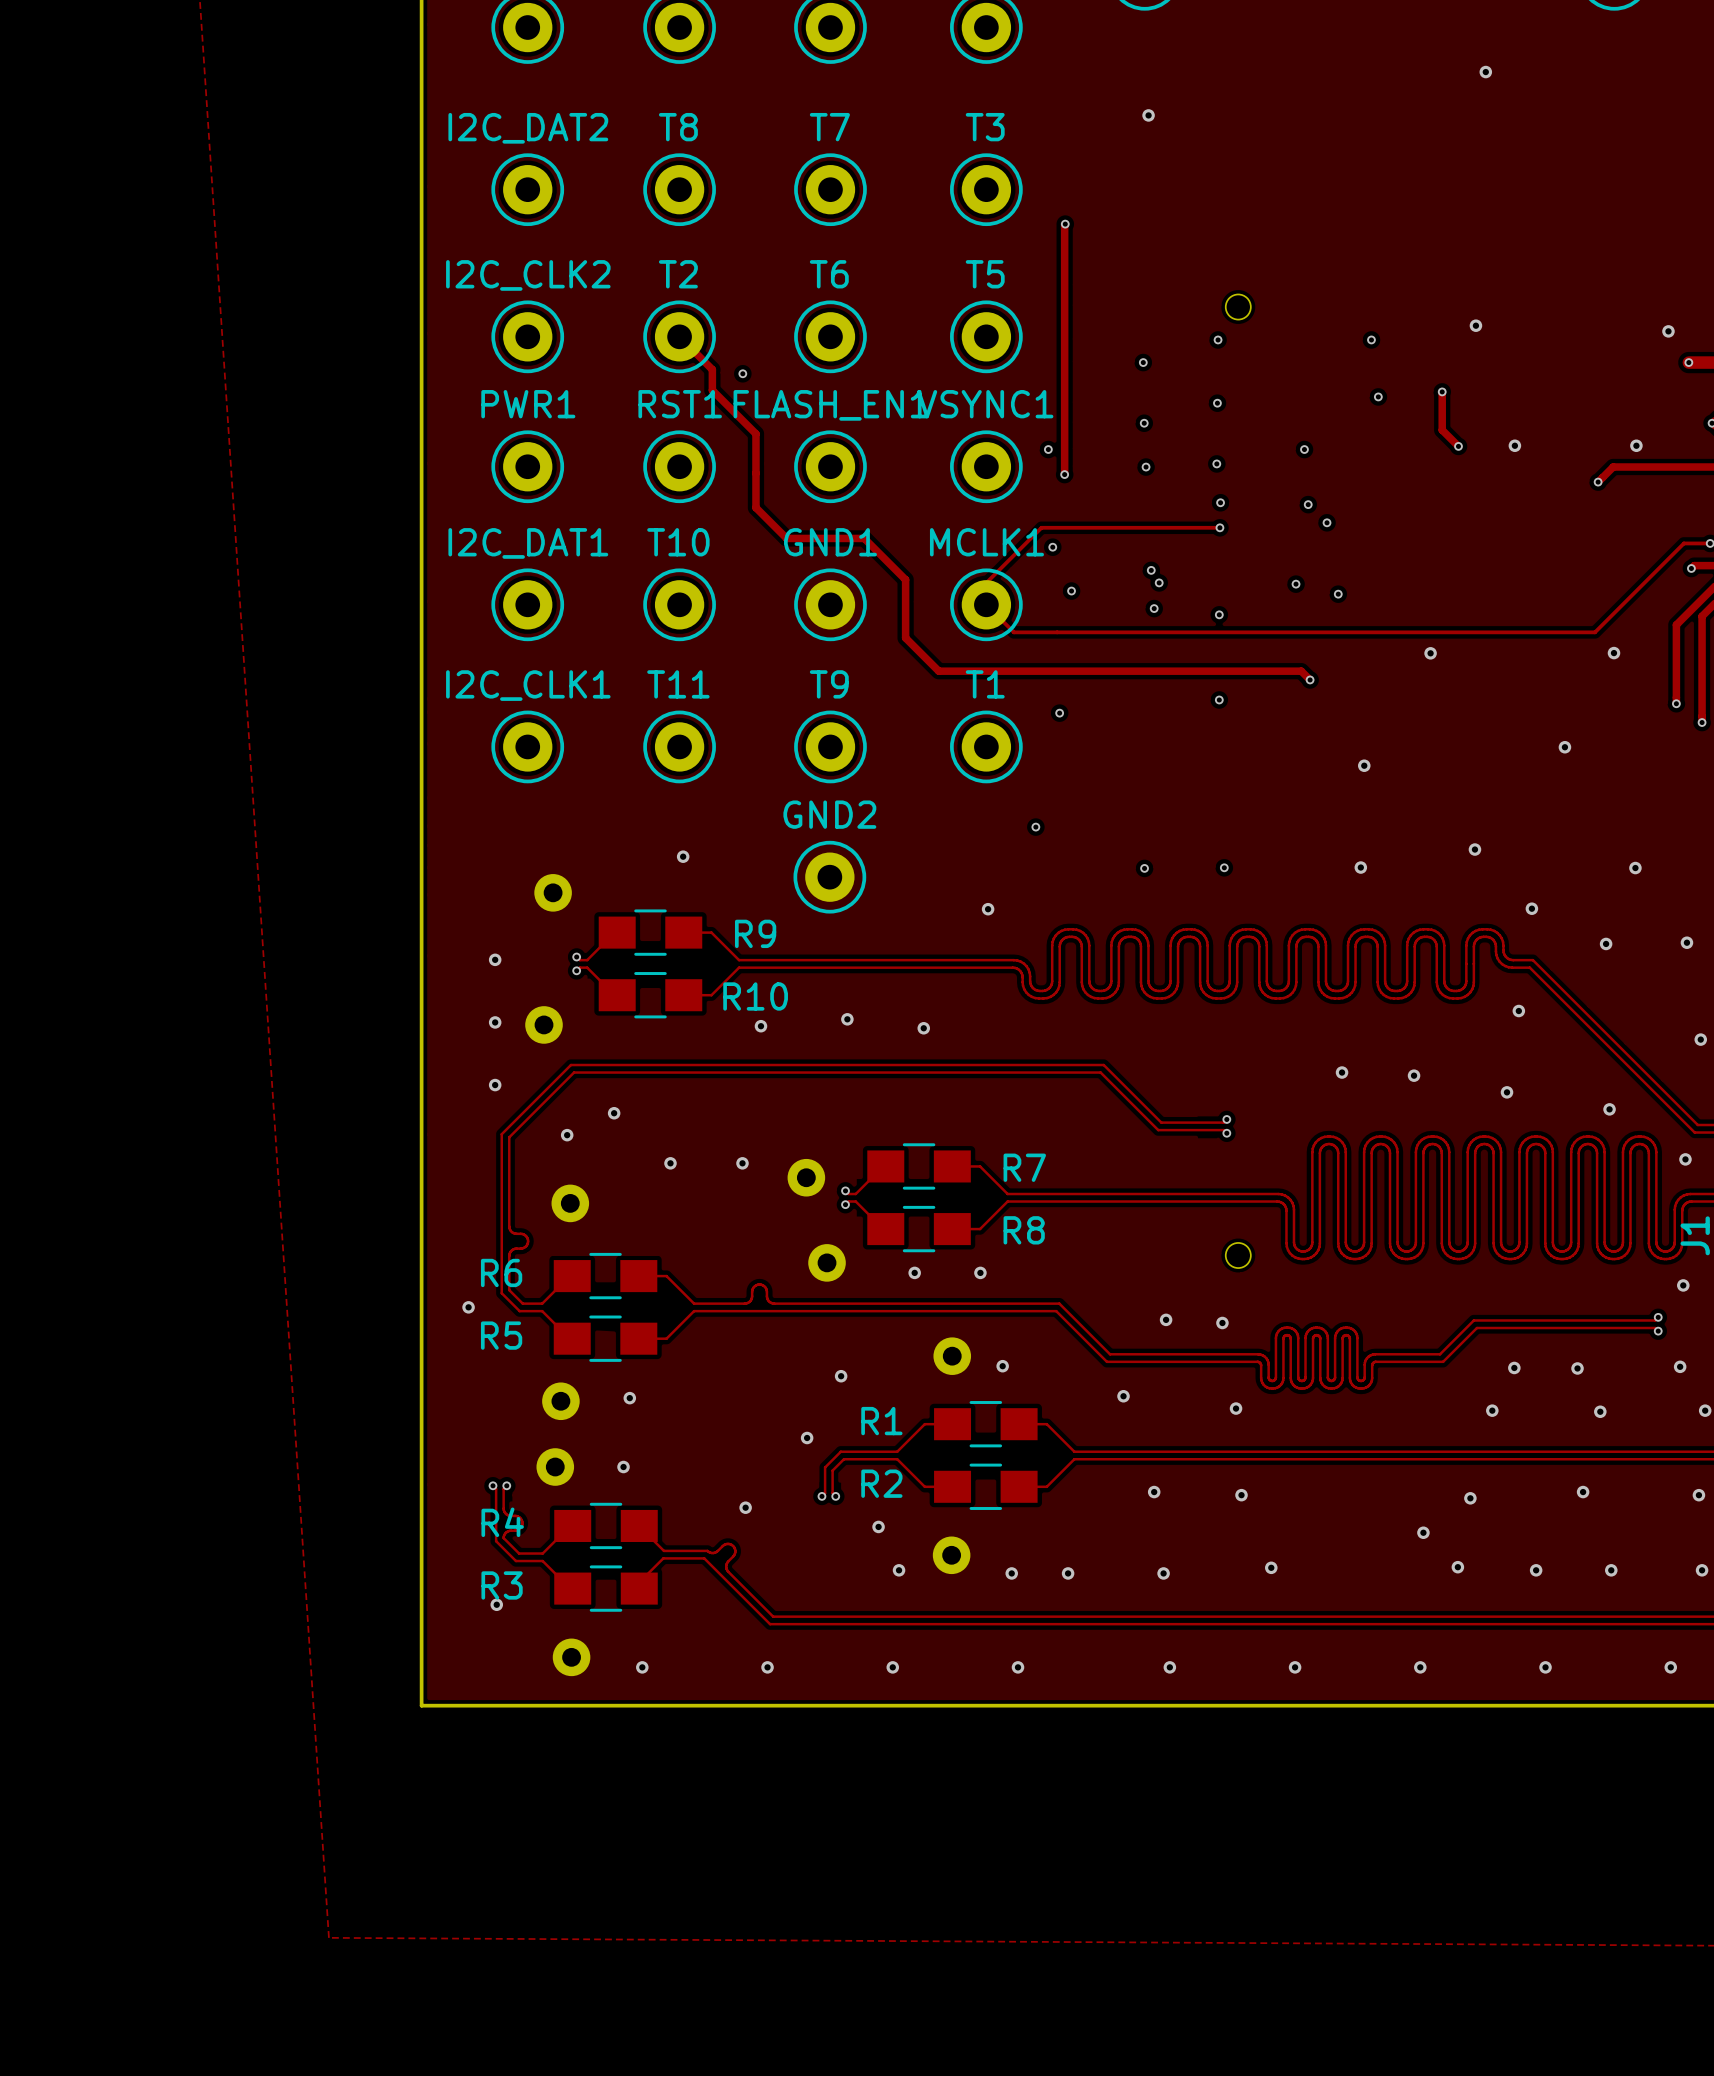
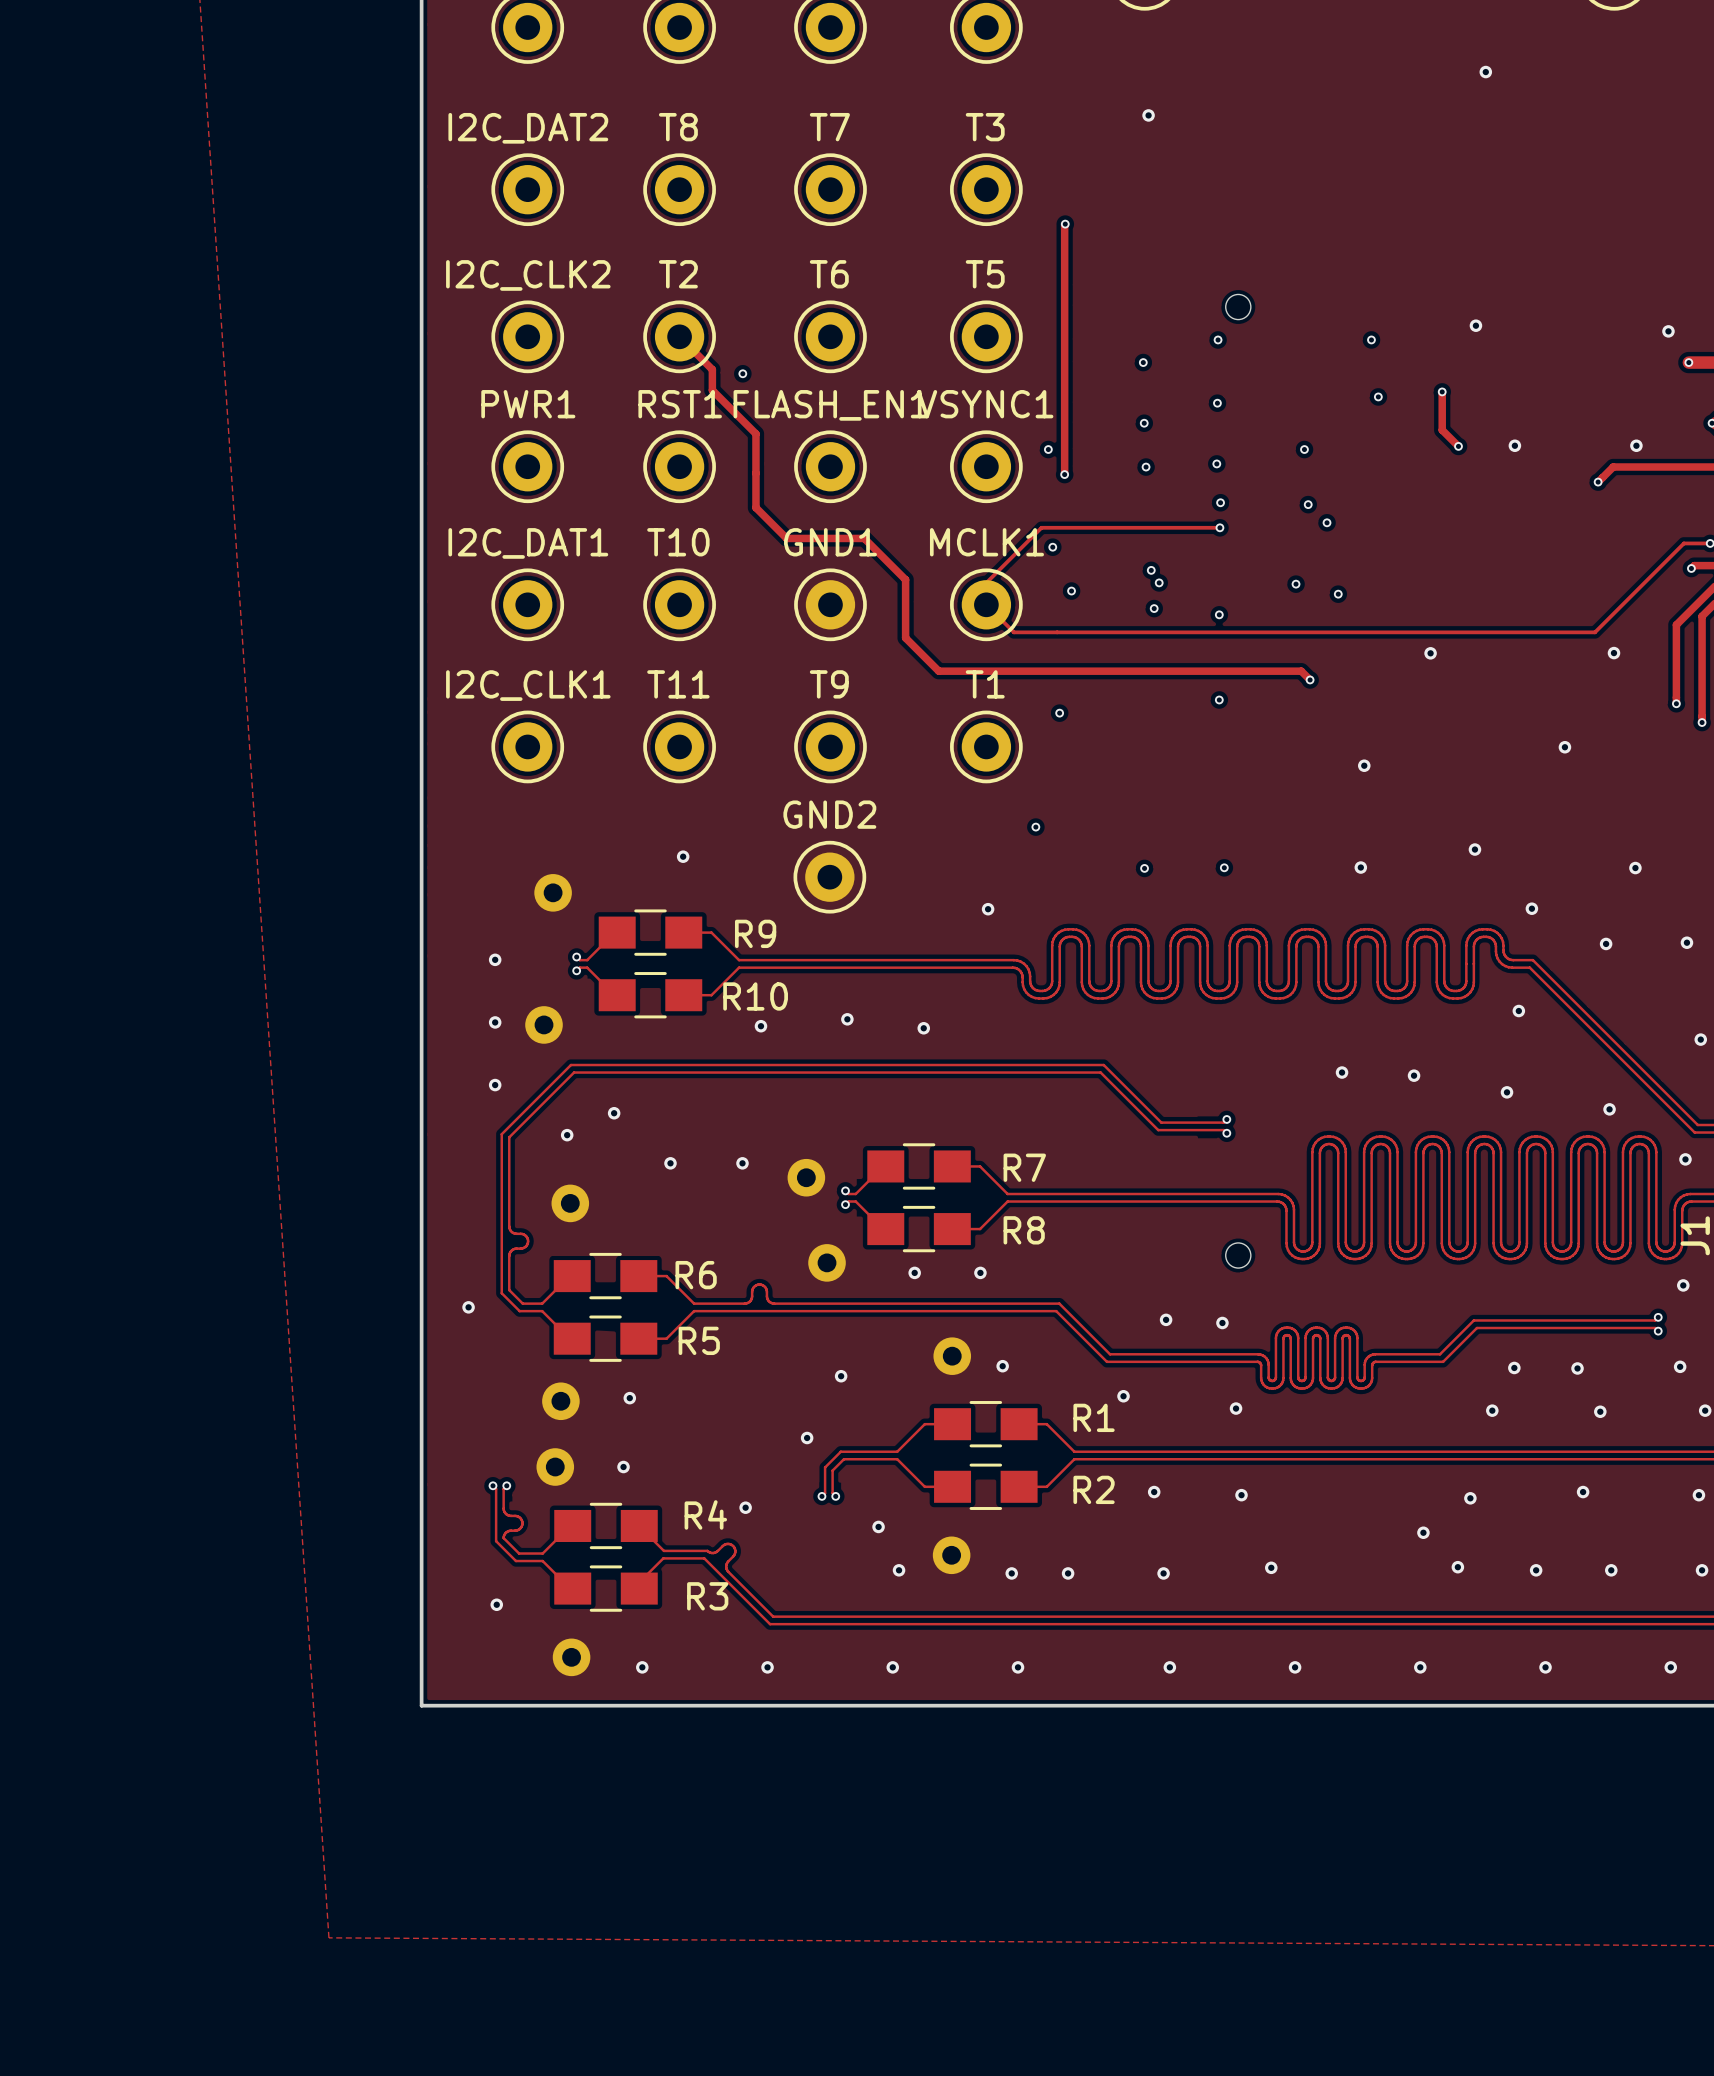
R6 name position: R6 (501, 1272) -> R6 (696, 1275)
R5 name position: R5 (501, 1335) -> R5 (699, 1340)
R1 name position: R1 (881, 1421) -> R1 (1094, 1417)
R2 name position: R2 (881, 1483) -> R2 (1094, 1489)
R4 name position: R4 (502, 1522) -> R4 (705, 1514)
R3 name position: R3 (502, 1585) -> R3 (707, 1596)

